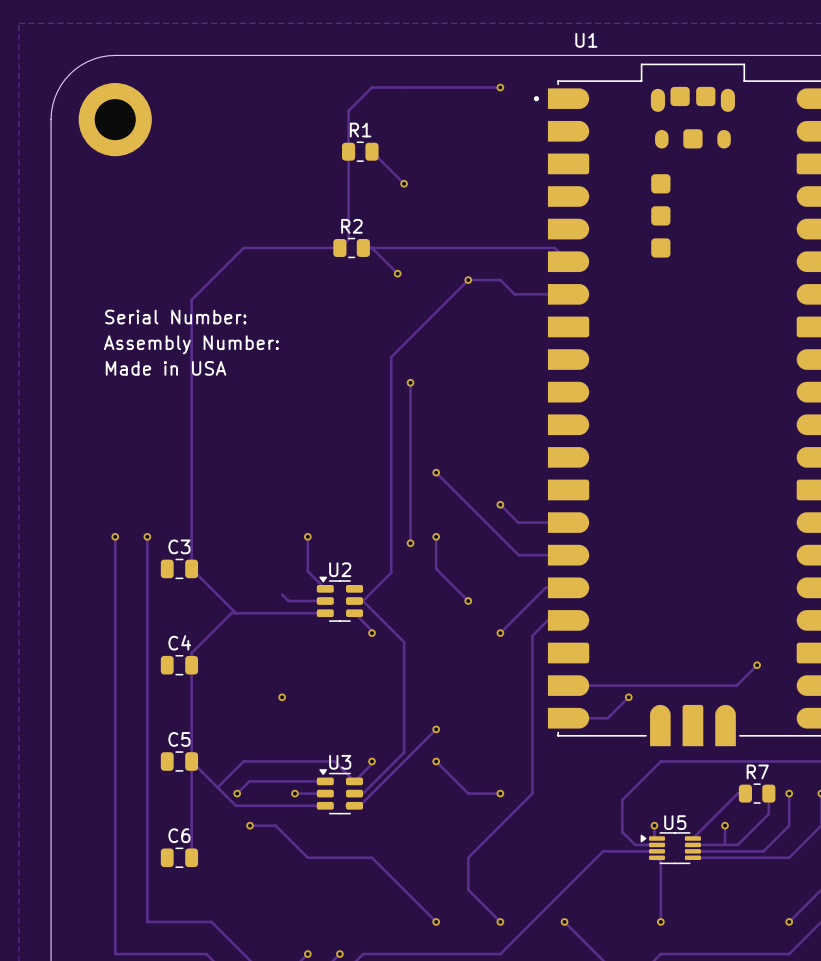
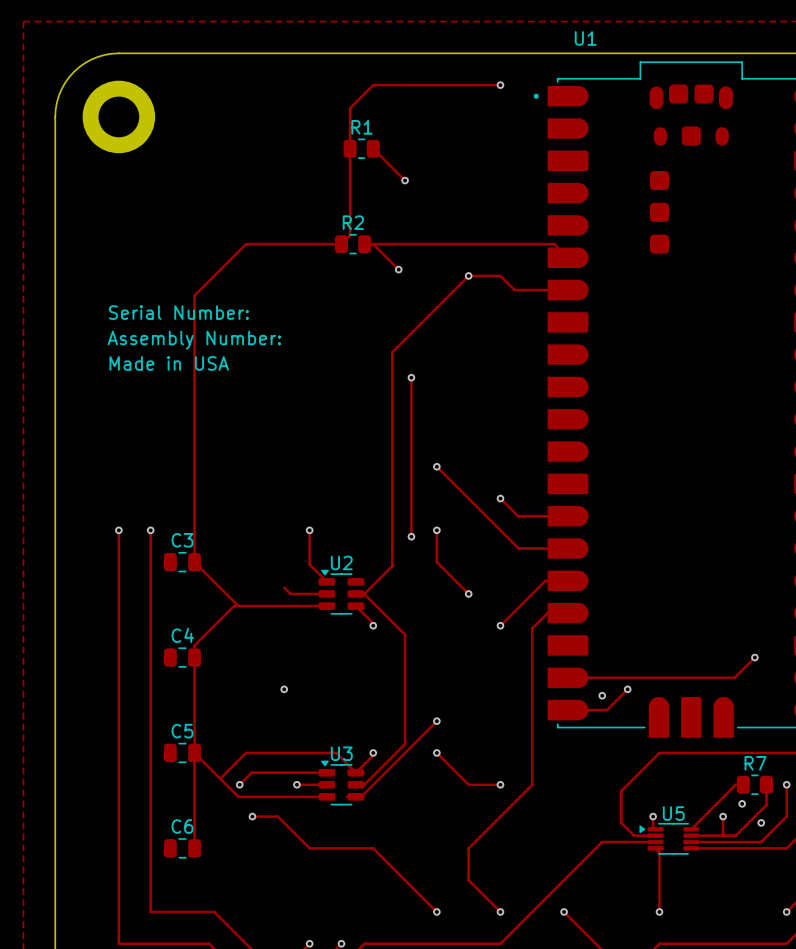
via: none -> (602, 695)
via: none -> (742, 803)
via: none -> (761, 822)

